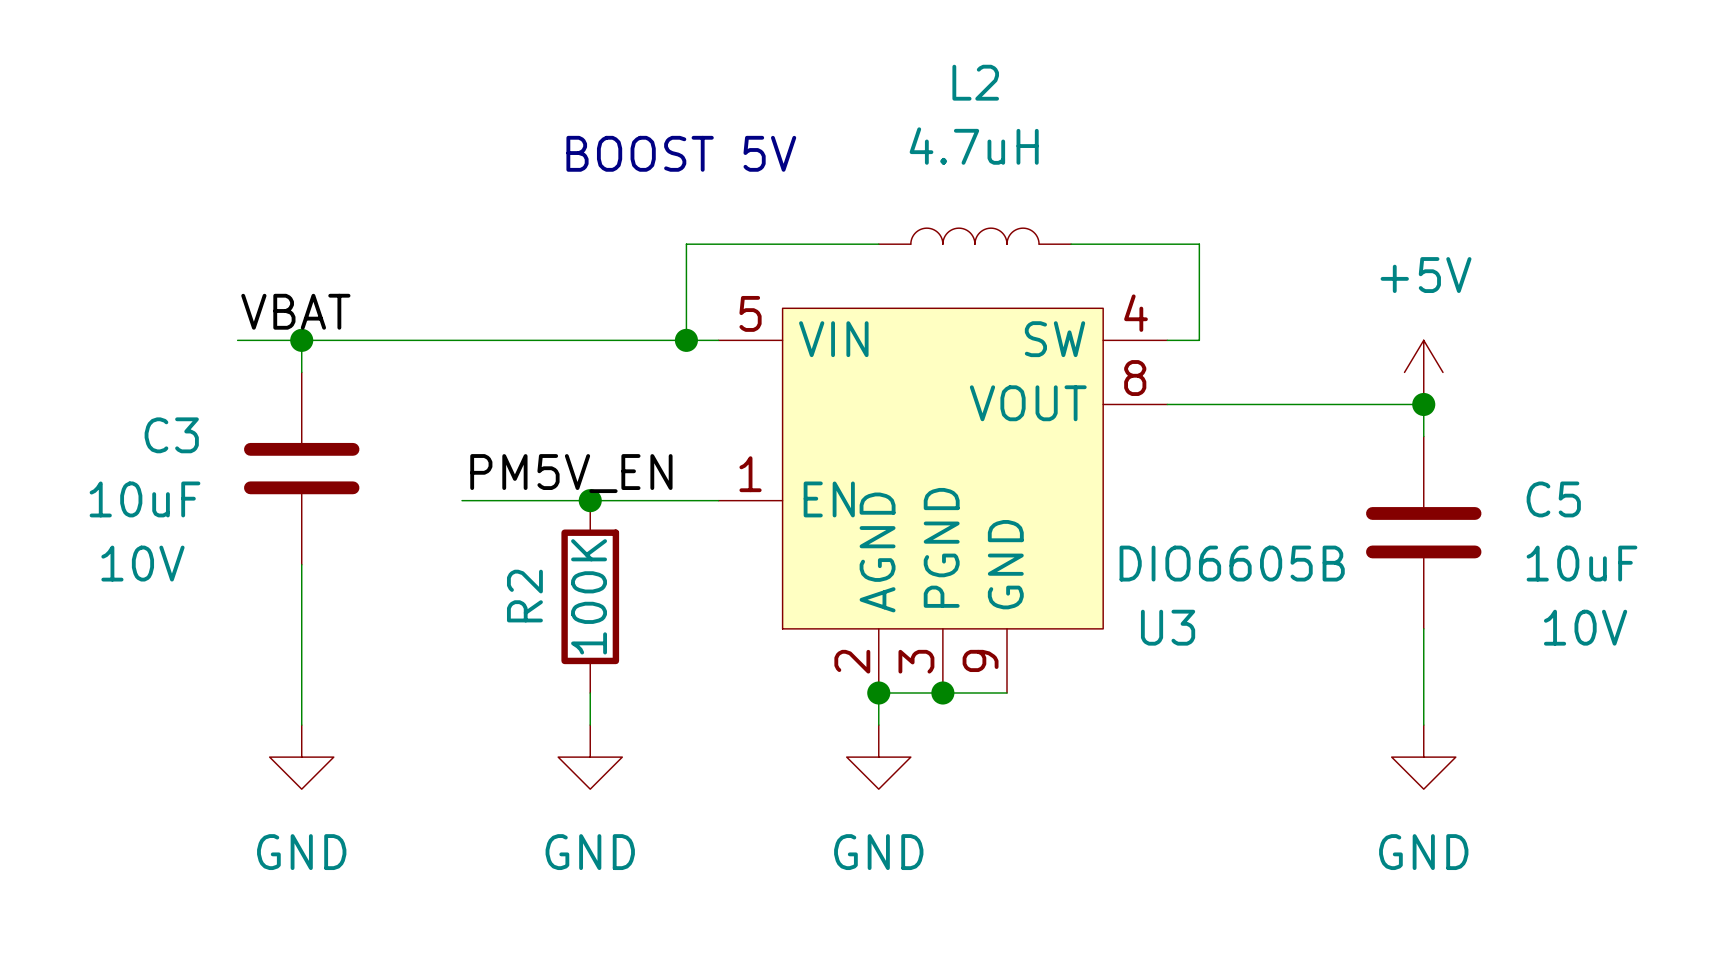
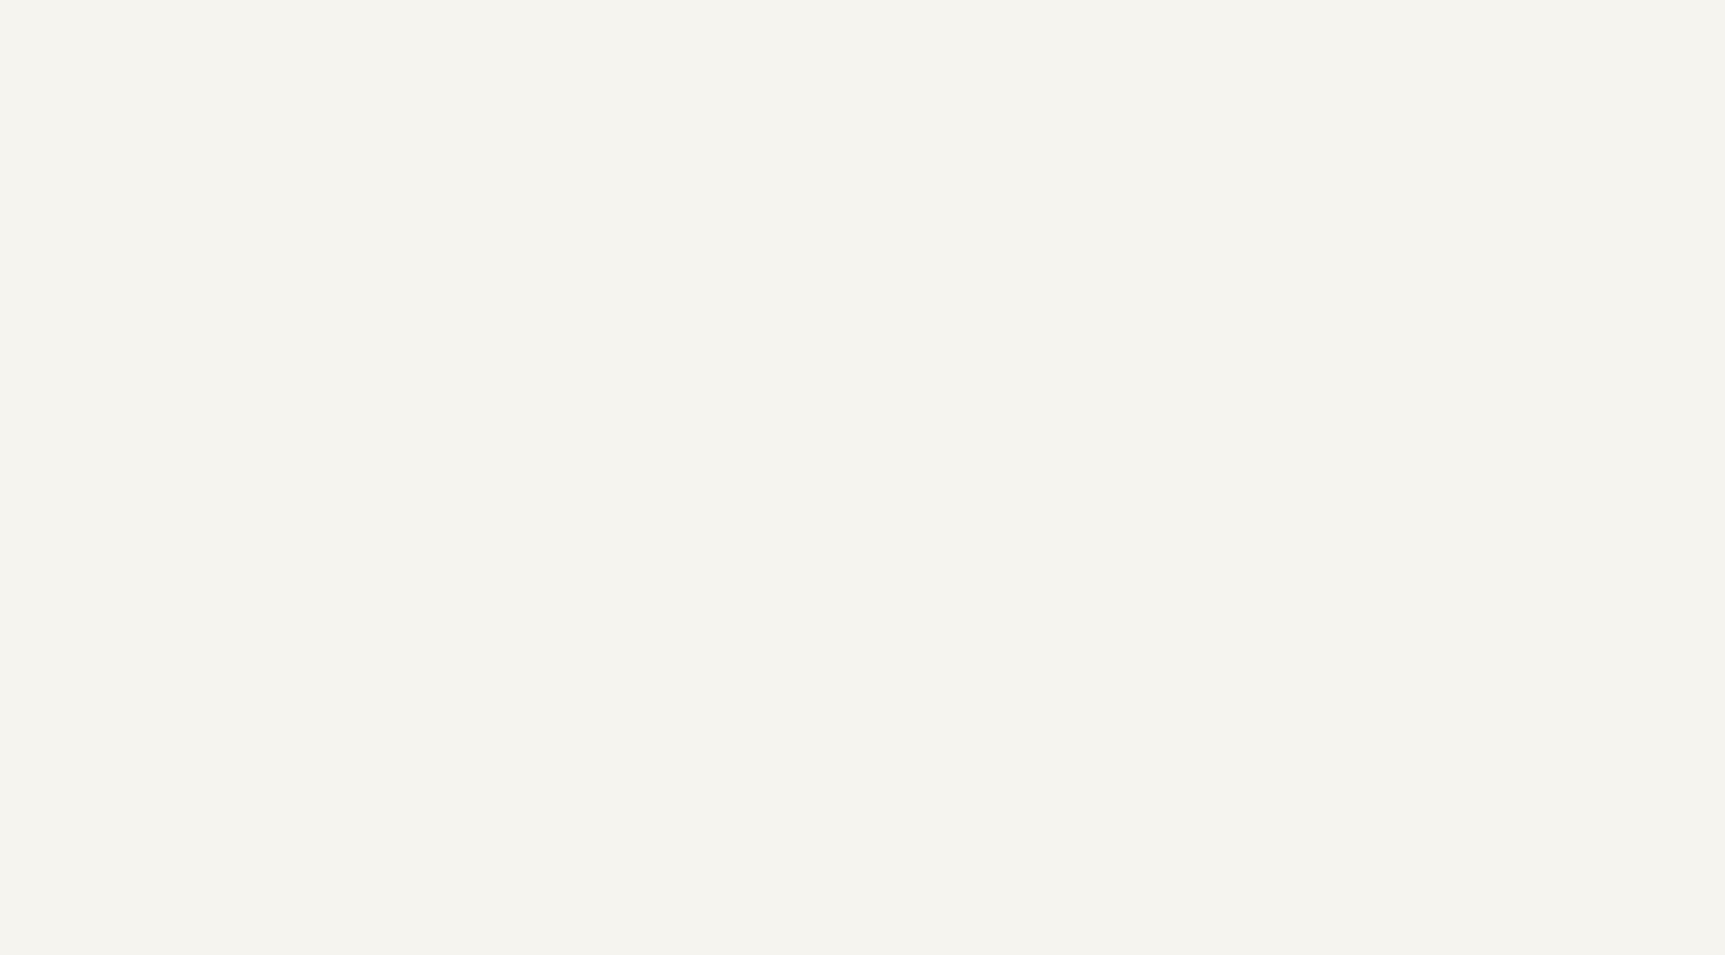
text: BOOST 5V (681, 153) -> none
L2: 4.7uH (974, 236) -> none
wire: (878, 244) (686, 244) (686, 340) -> none
wire: (1071, 244) (1199, 244) (1199, 340) (1167, 340) -> none
label: VBAT (295, 311) -> none
wire: (237, 340) (718, 340) -> none
wire: (301, 340) (301, 372) -> none
junction: (301, 340) -> none
junction: (686, 340) -> none
power symbol: +5V (1423, 372) -> none
wire: (1167, 404) (1423, 404) (1423, 436) -> none
junction: (1423, 404) -> none
C3: 10uF (301, 468) -> none
label: PM5V_EN (571, 473) -> none
wire: (462, 500) (718, 500) -> none
junction: (590, 500) -> none
U3: DIO6605B (942, 500) -> none
C5: 10uF (1423, 532) -> none
wire: (301, 564) (301, 725) -> none
R2: 100K (590, 596) -> none
wire: (1423, 628) (1423, 725) -> none
wire: (590, 693) (590, 725) -> none
junction: (878, 693) -> none
junction: (942, 693) -> none
wire: (1007, 693) (878, 693) (878, 725) -> none
power symbol: GND (301, 757) -> none
power symbol: GND (590, 757) -> none
power symbol: GND (878, 757) -> none
power symbol: GND (1423, 757) -> none

